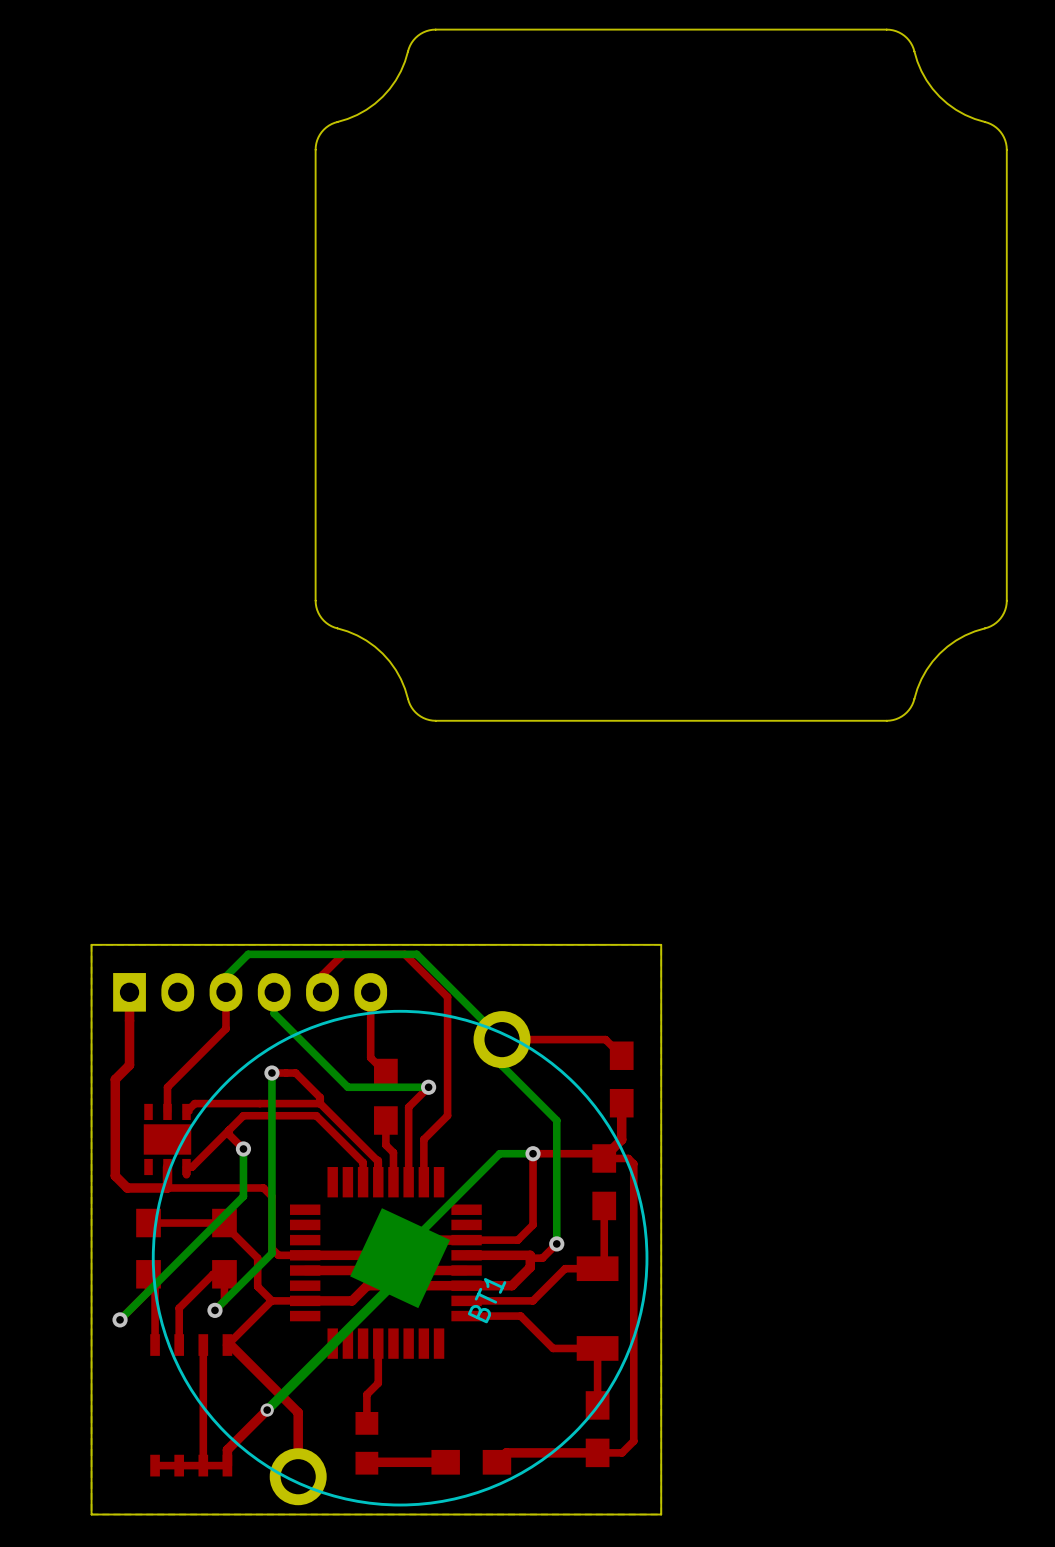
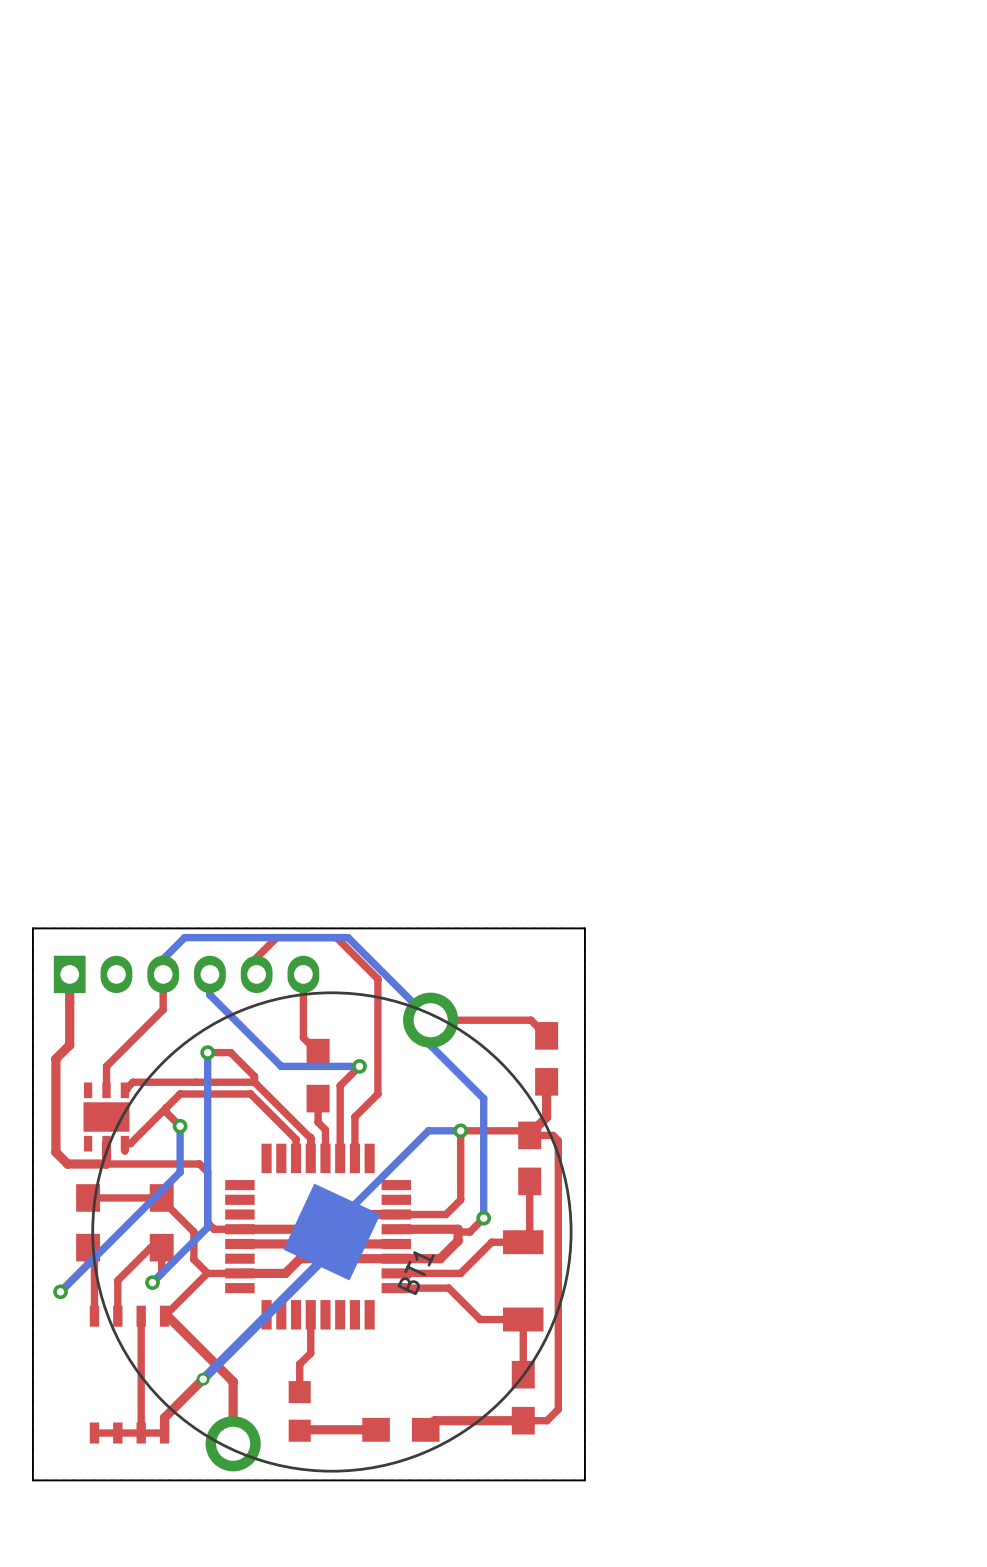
board edge: (886, 29) (429, 30) (418, 35) (411, 42) (400, 71) (382, 96) (357, 114) (328, 125) (319, 134) (315, 149) (316, 606) (321, 618) (328, 624) (357, 635) (382, 653) (400, 679) (411, 707) (420, 716) (435, 720) (893, 720) (901, 716) (910, 707) (921, 679) (939, 653) (965, 635) (993, 624) (1002, 615) (1006, 600) (1006, 143) (1002, 134) (993, 125) (965, 114) (939, 96) (921, 71) (908, 40) (898, 32) (886, 29) -> none

